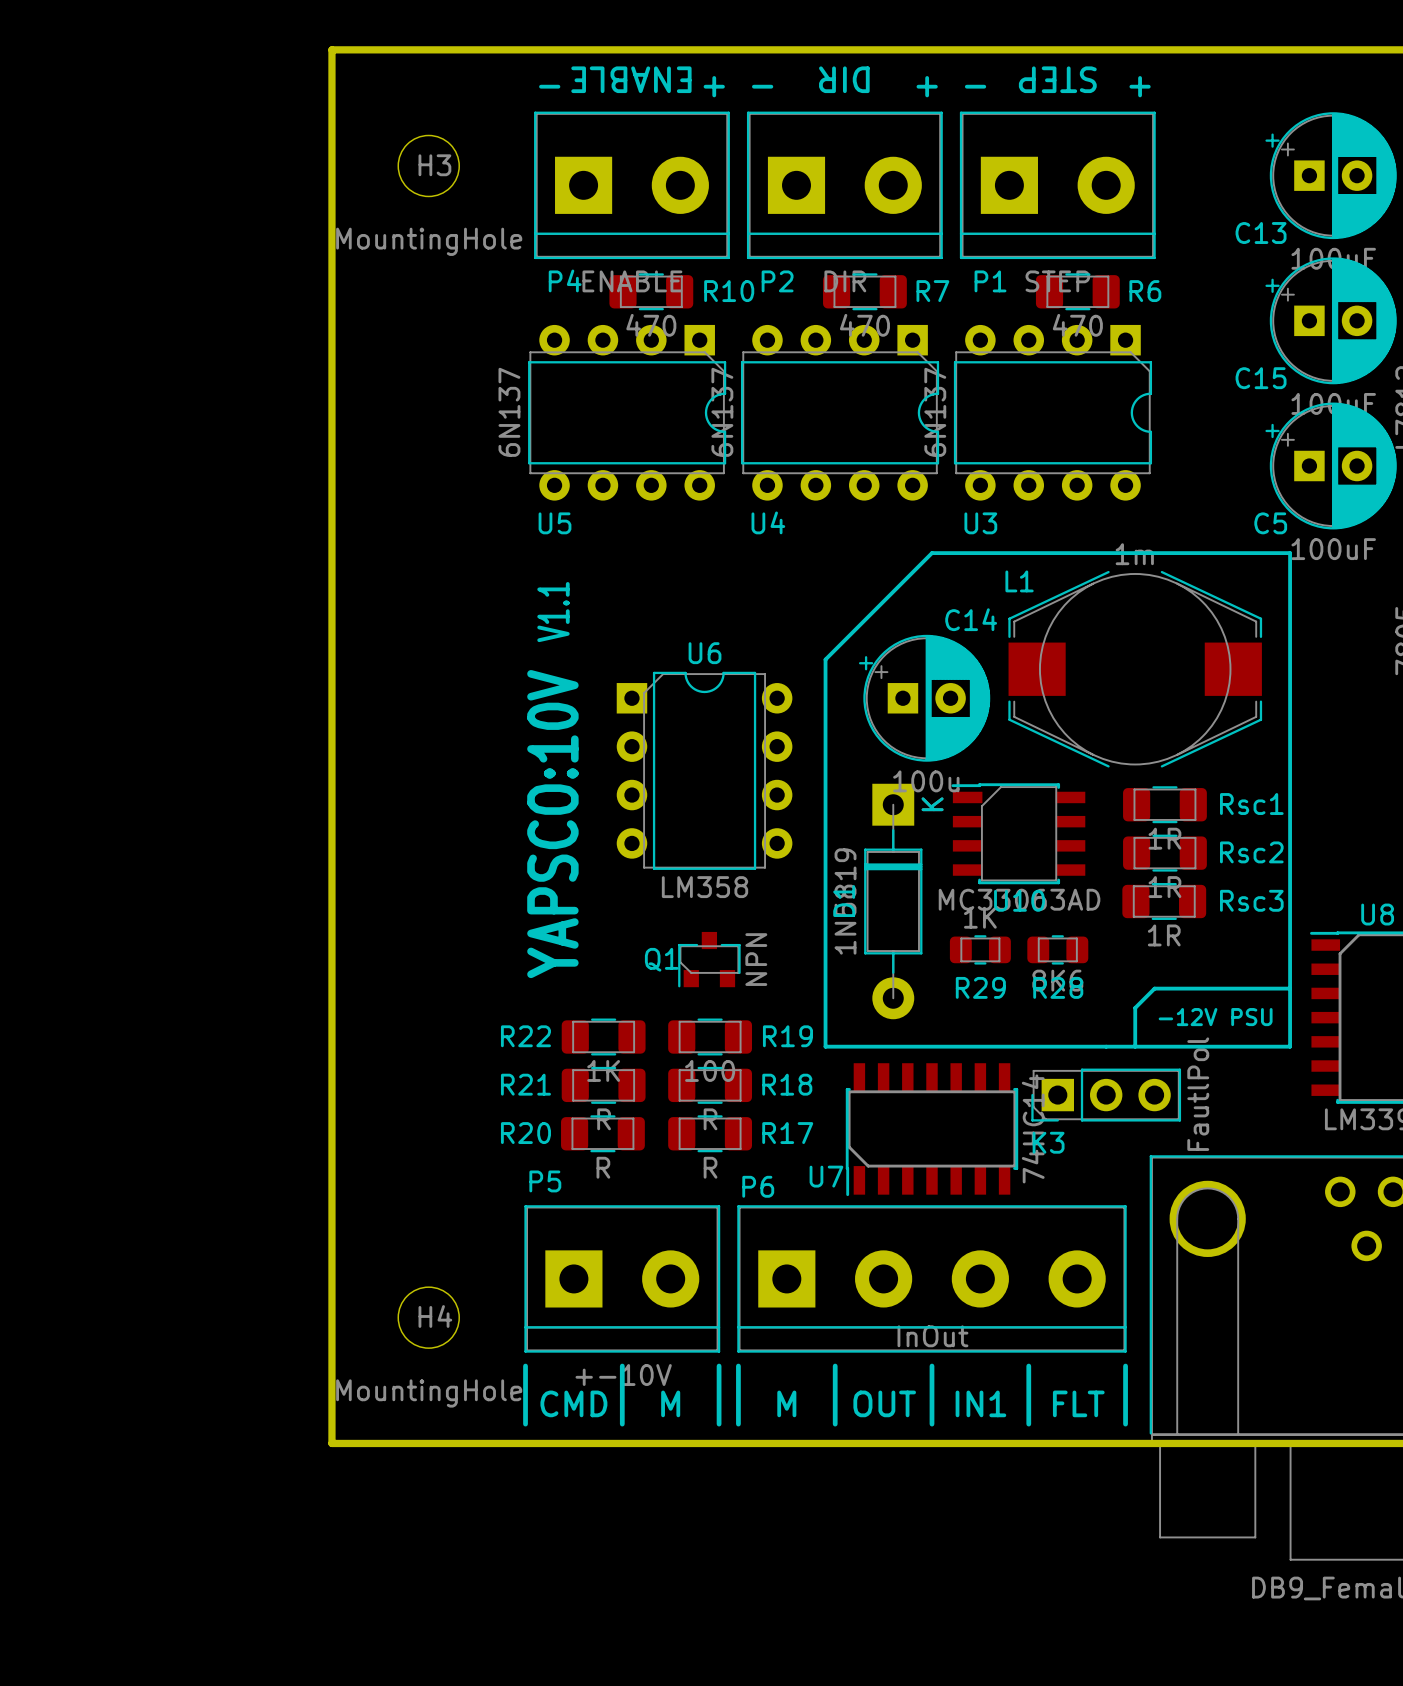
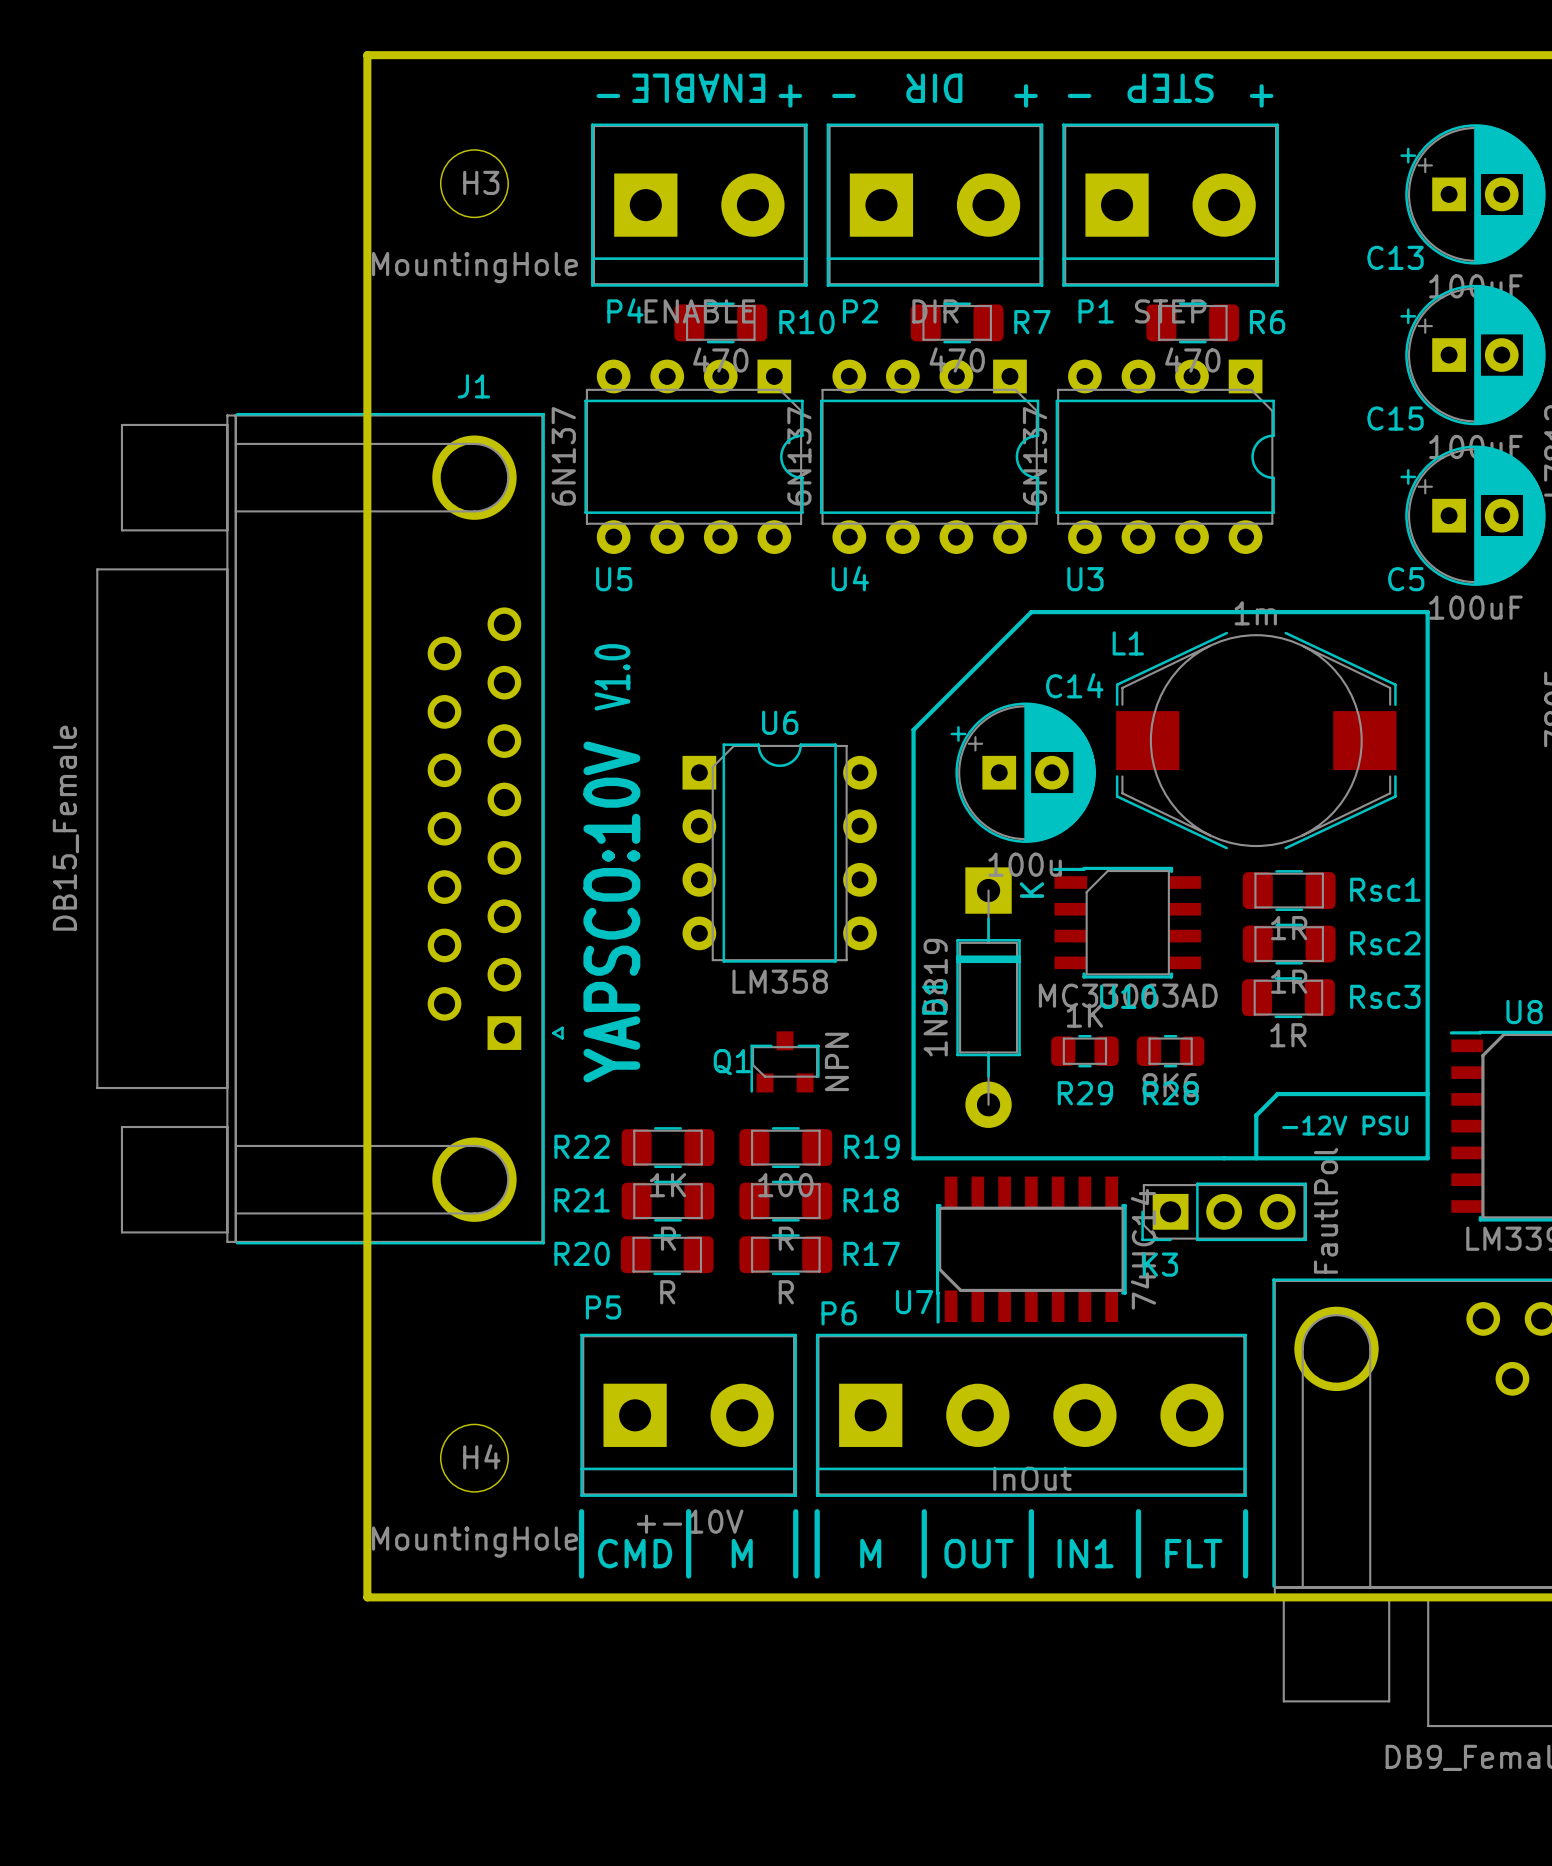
text: V1.1 (553, 612) -> V1.0 (612, 677)
J1: none -> DB15_Female (329, 828)

